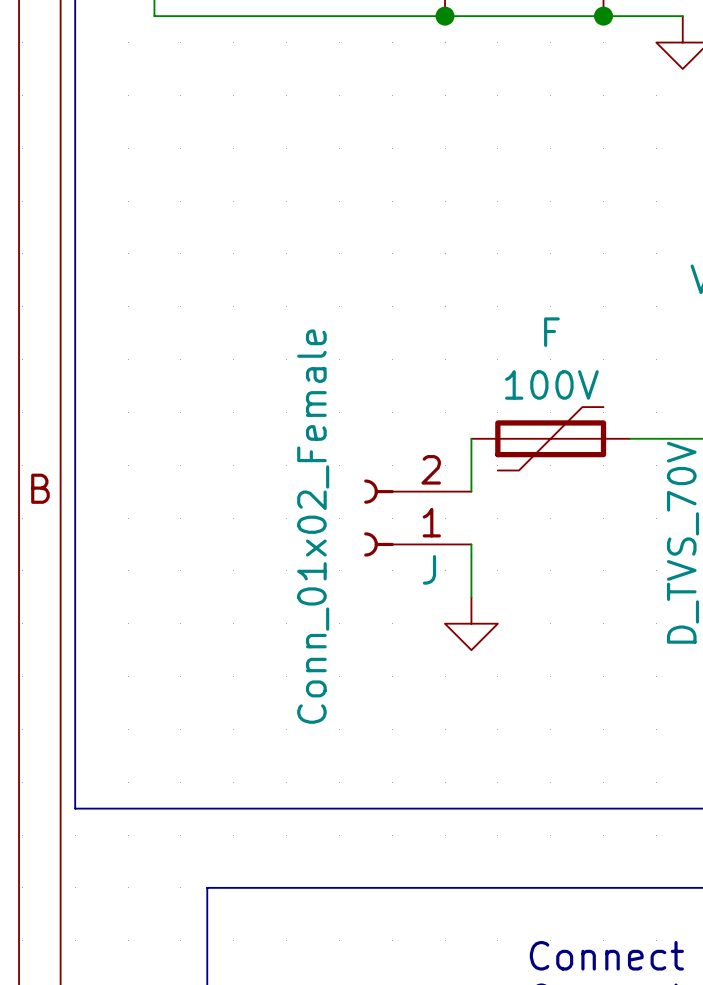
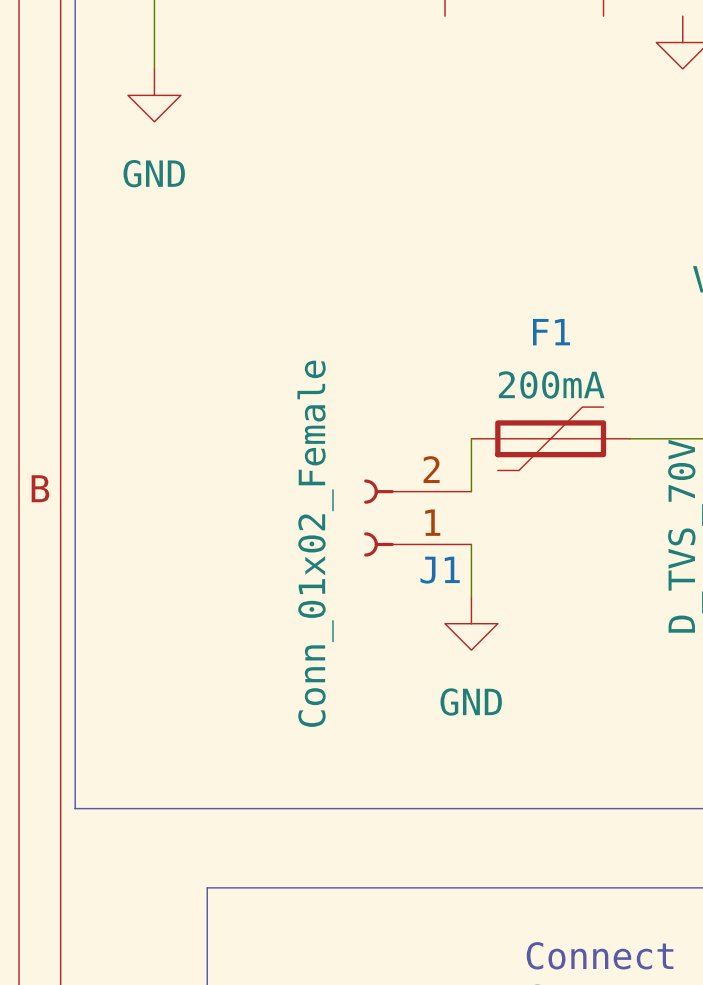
wire: (154, 16) (682, 16) -> (154, 16) (154, 68)
junction: (445, 16) -> none
junction: (603, 16) -> none
power symbol: none -> GND (154, 95)
F name: F (551, 332) -> F1 (551, 332)
F text: 100V (551, 384) -> 200mA (551, 384)
J name: J (429, 569) -> J1 (440, 570)
power symbol text: none -> GND (471, 701)

